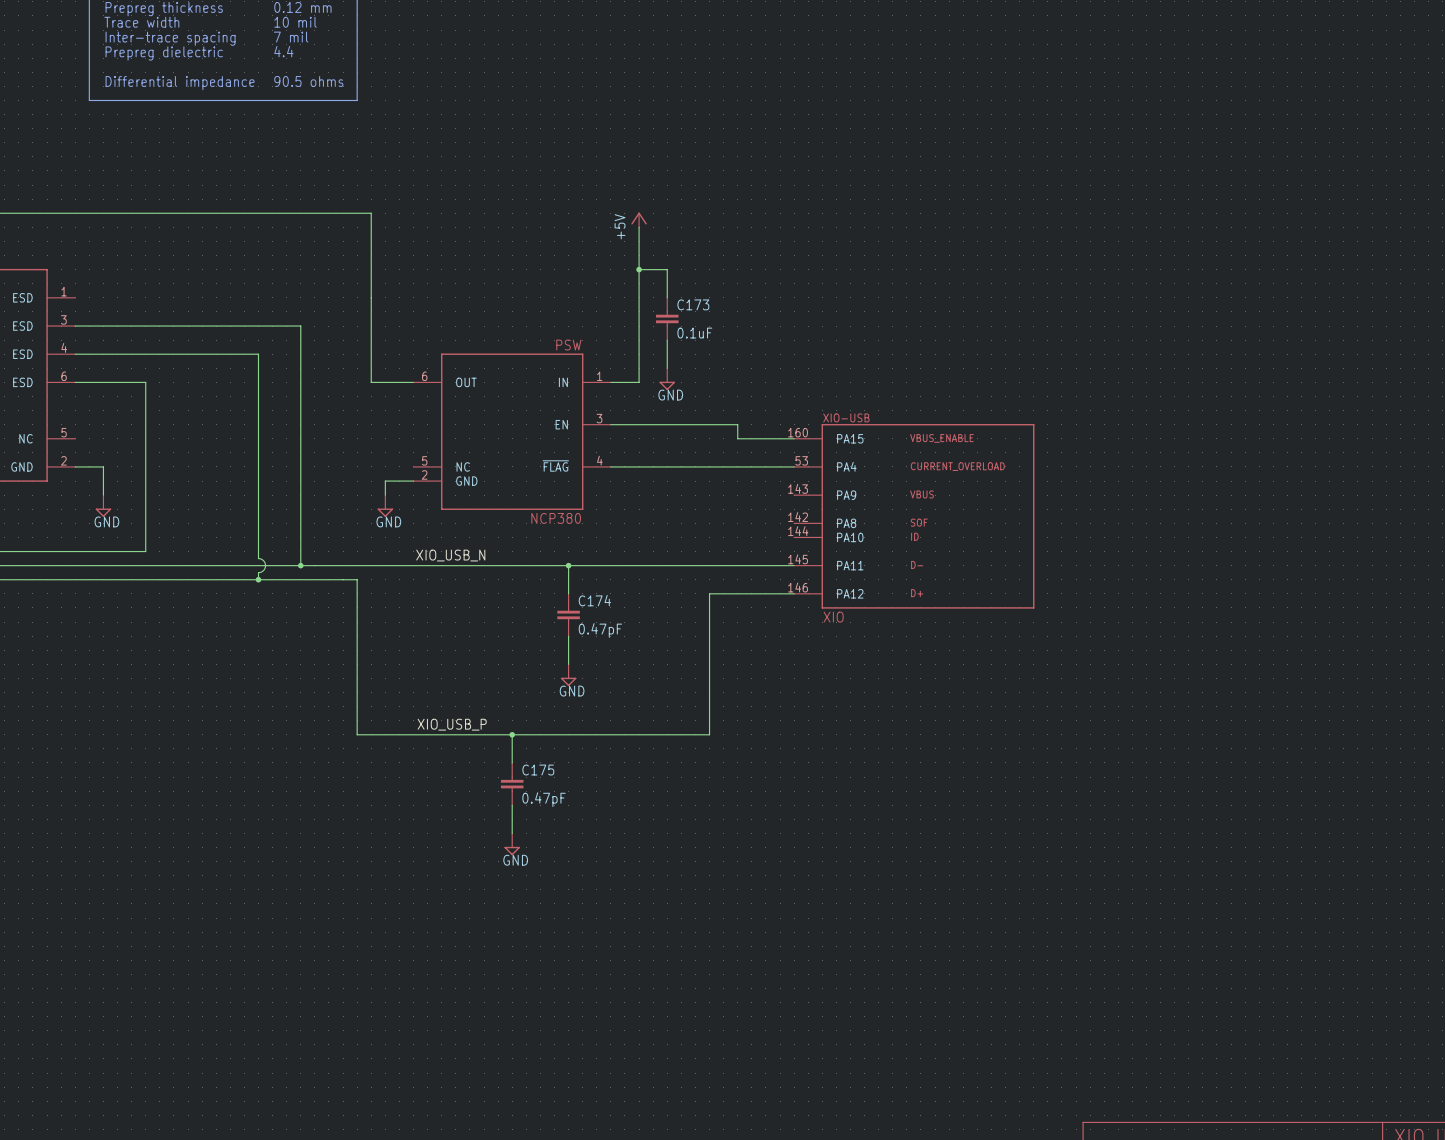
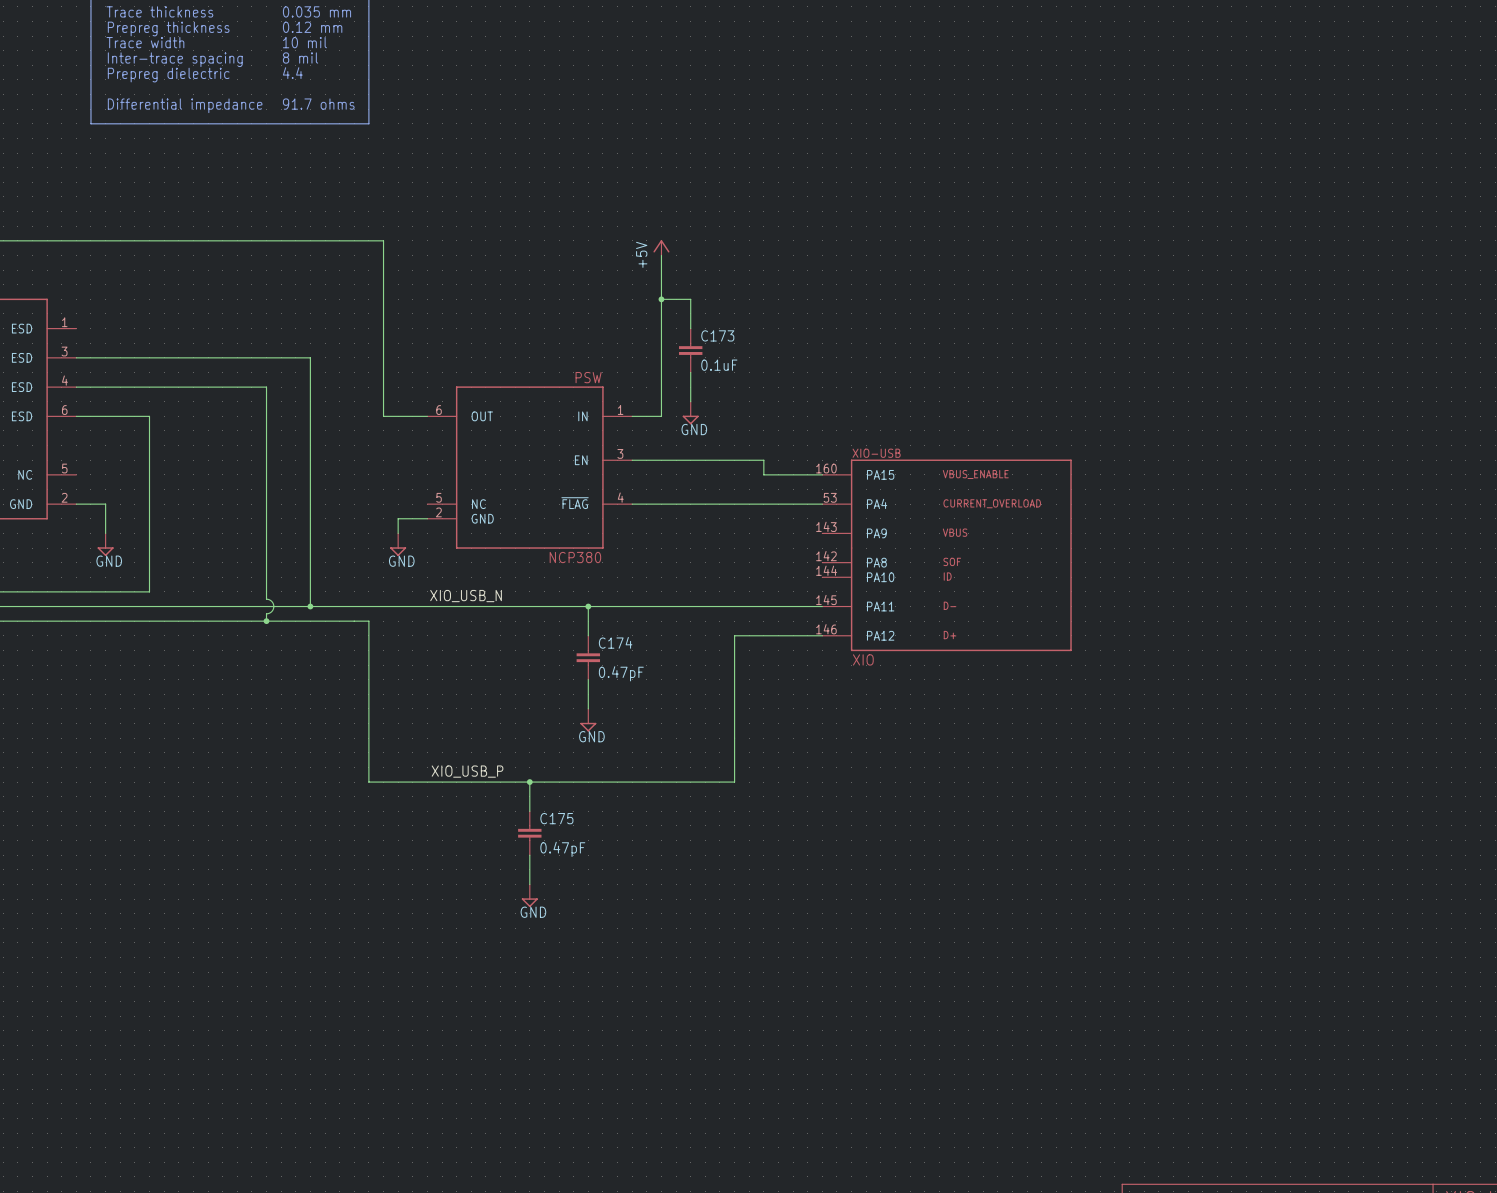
text: 7 mil (291, 37) -> 8 mil (300, 58)
text: 90.5 ohms (308, 81) -> 91.7 ohms (318, 104)

